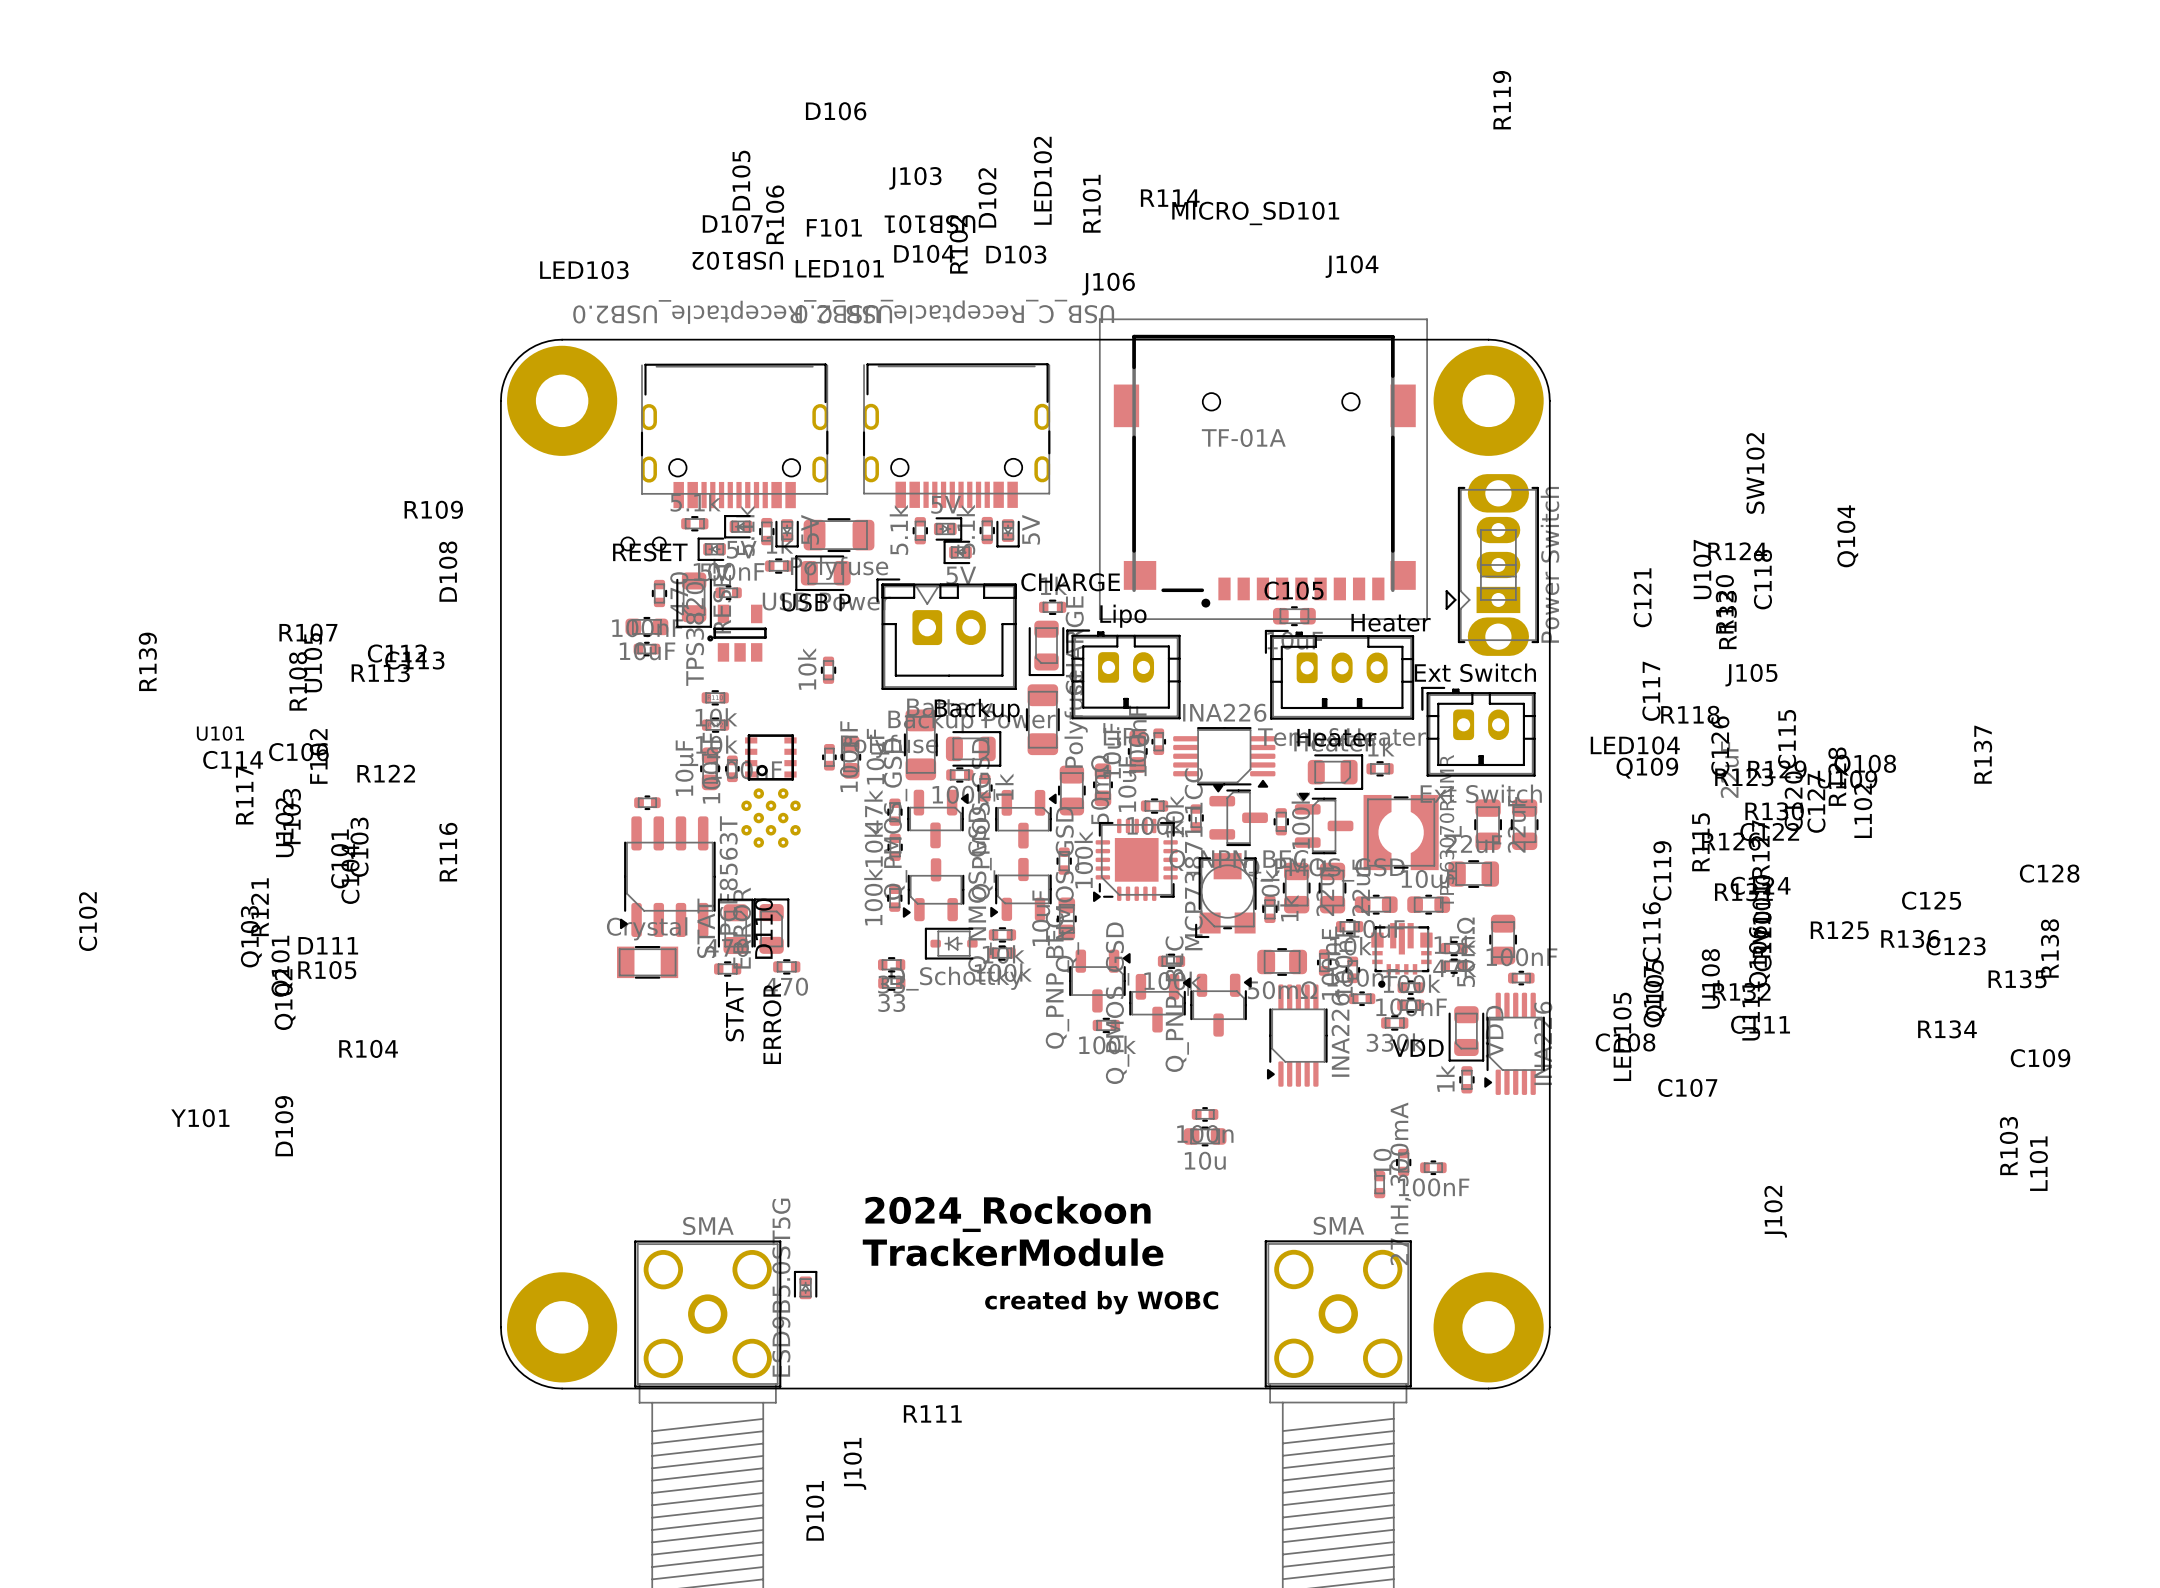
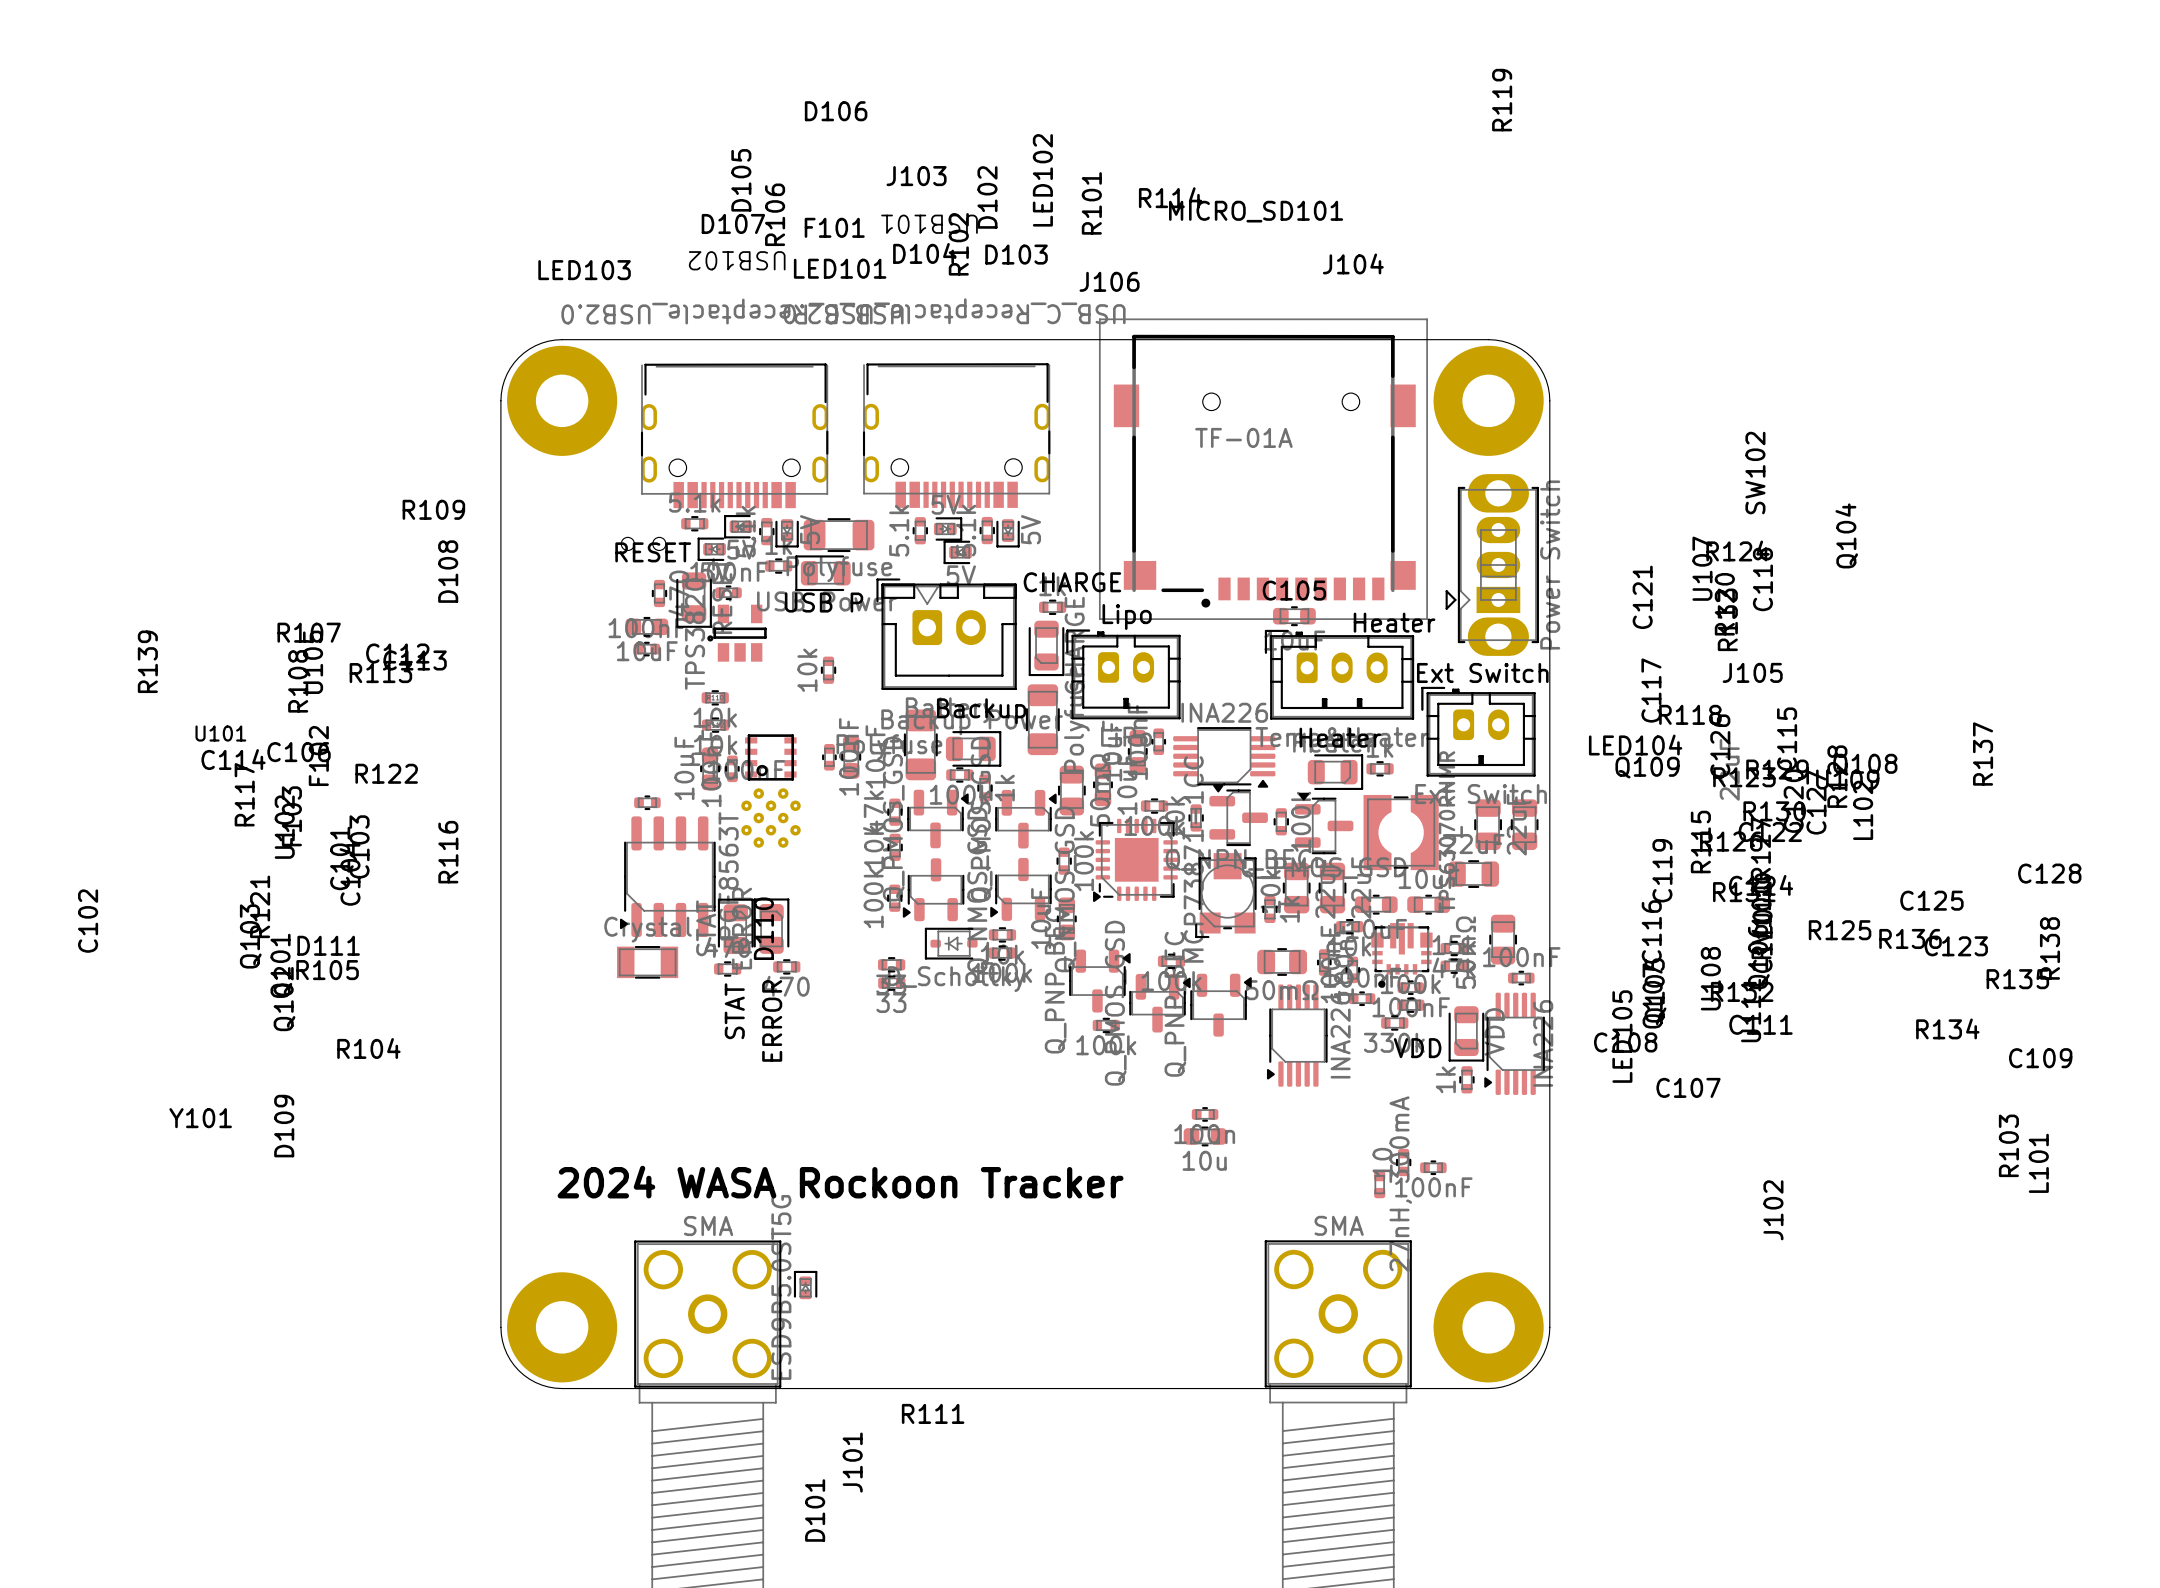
text: none -> 2024 WASA Rockoon Tracker (840, 1182)
text: 2024_Rockoon (1008, 1214) -> none
text: TrackerModule (1013, 1252) -> none
text: created by WOBC (1101, 1302) -> none

